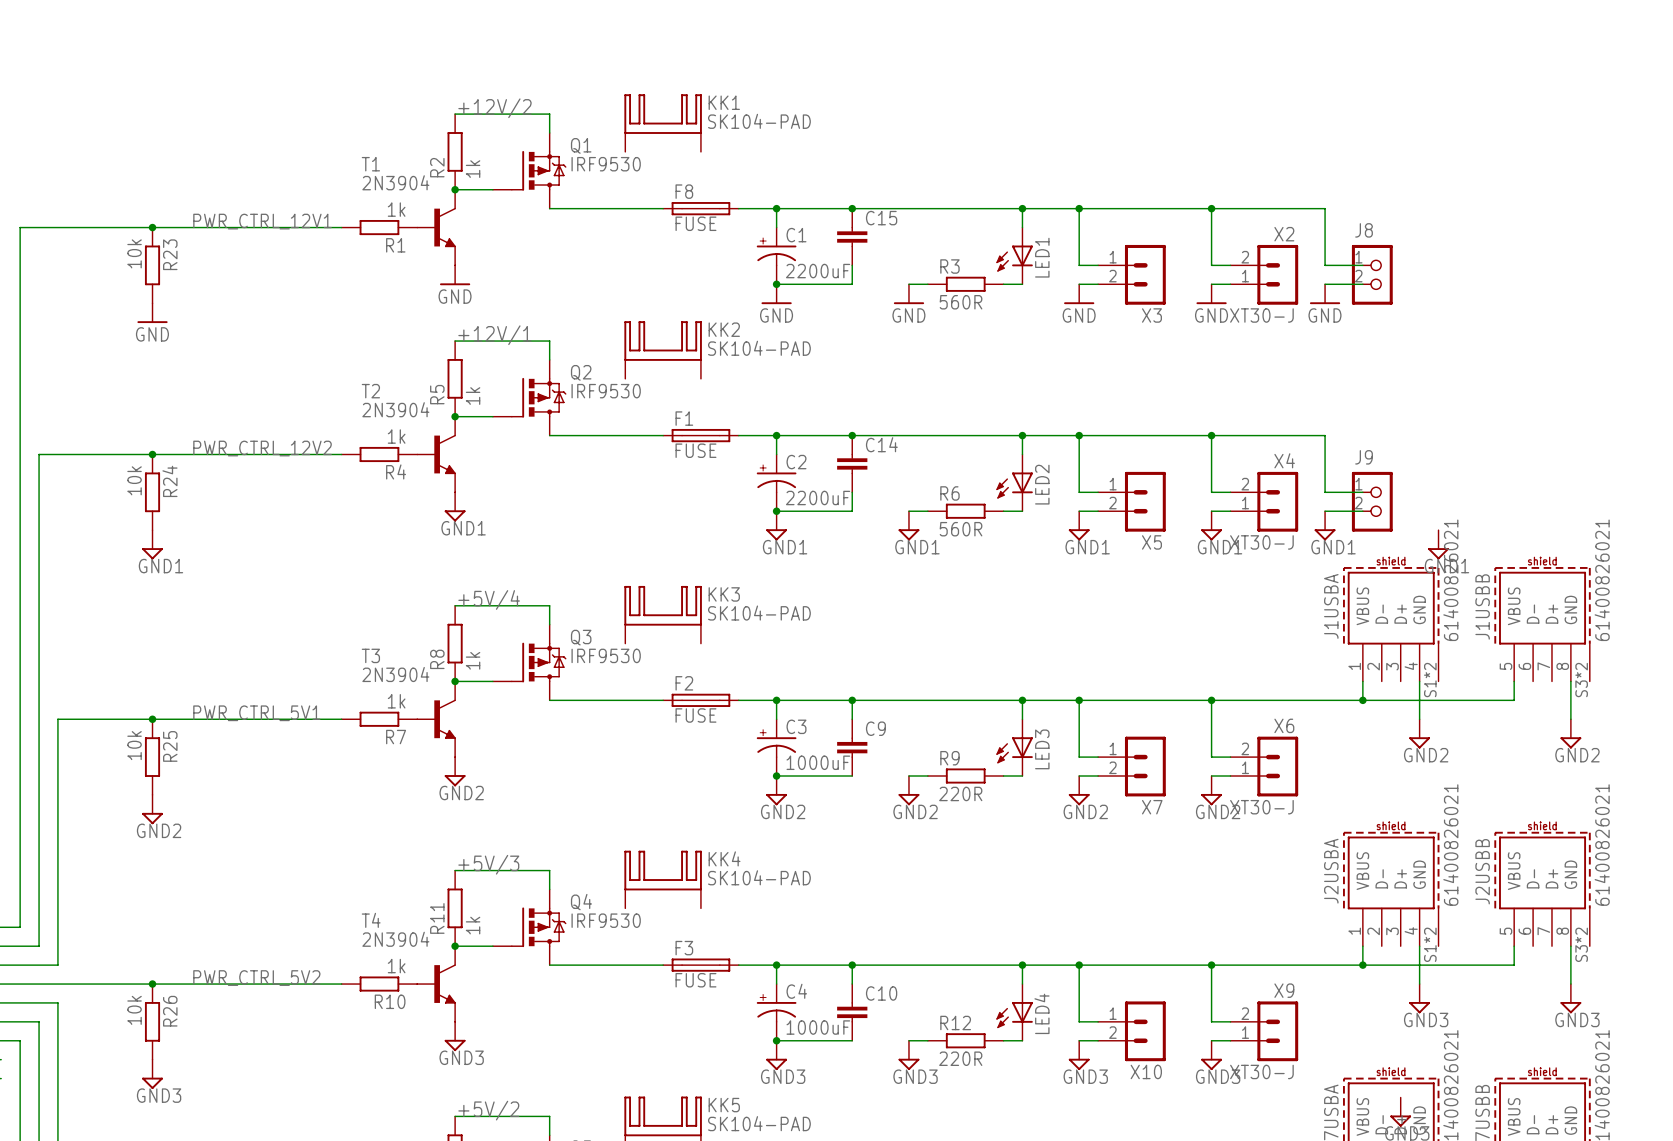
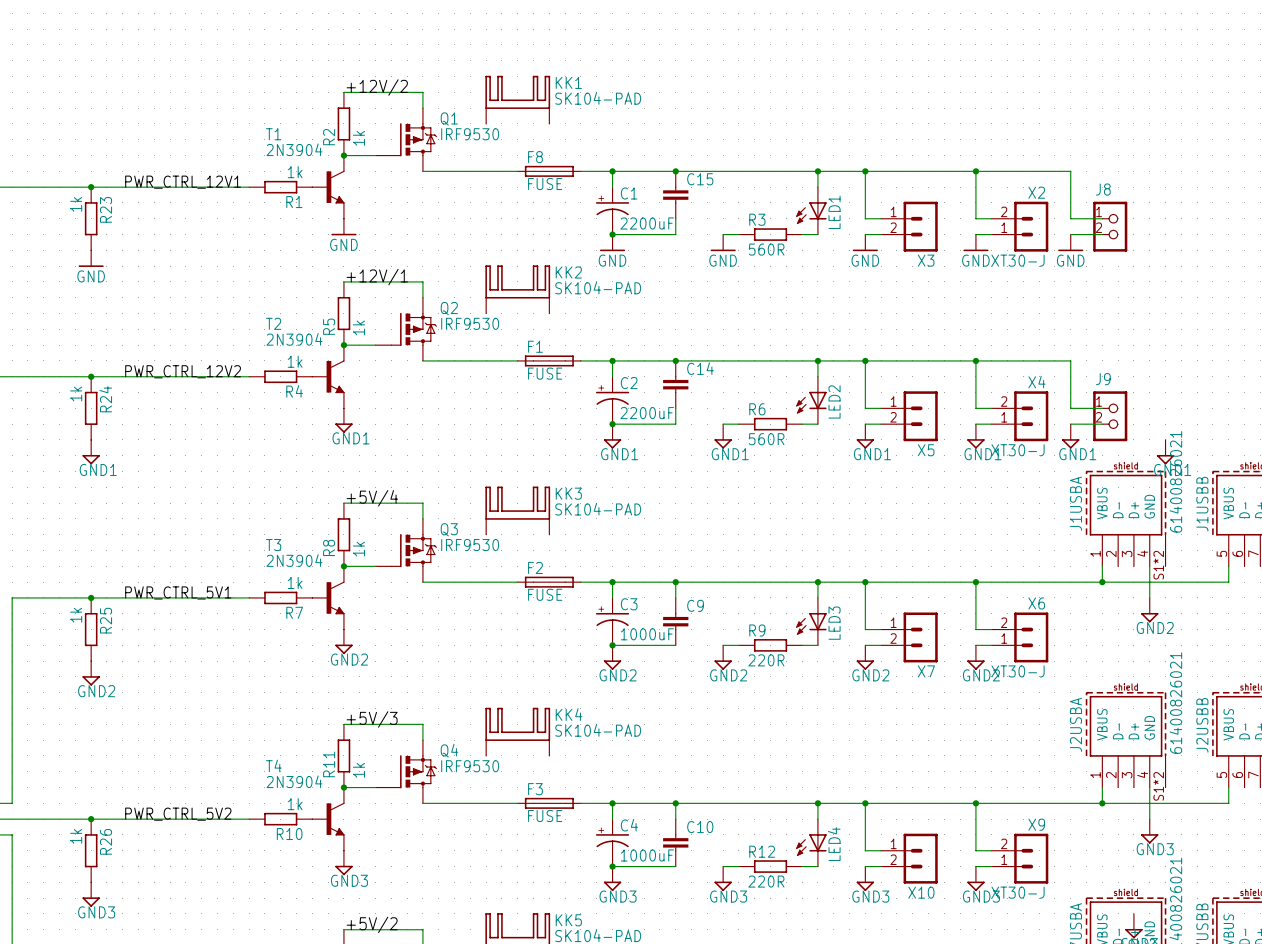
R23 value: 10k (134, 253) -> 1k (76, 204)
R24 value: 10k (134, 480) -> 1k (76, 394)
R25 value: 10k (134, 745) -> 1k (76, 615)
R26 value: 10k (134, 1010) -> 1k (76, 836)

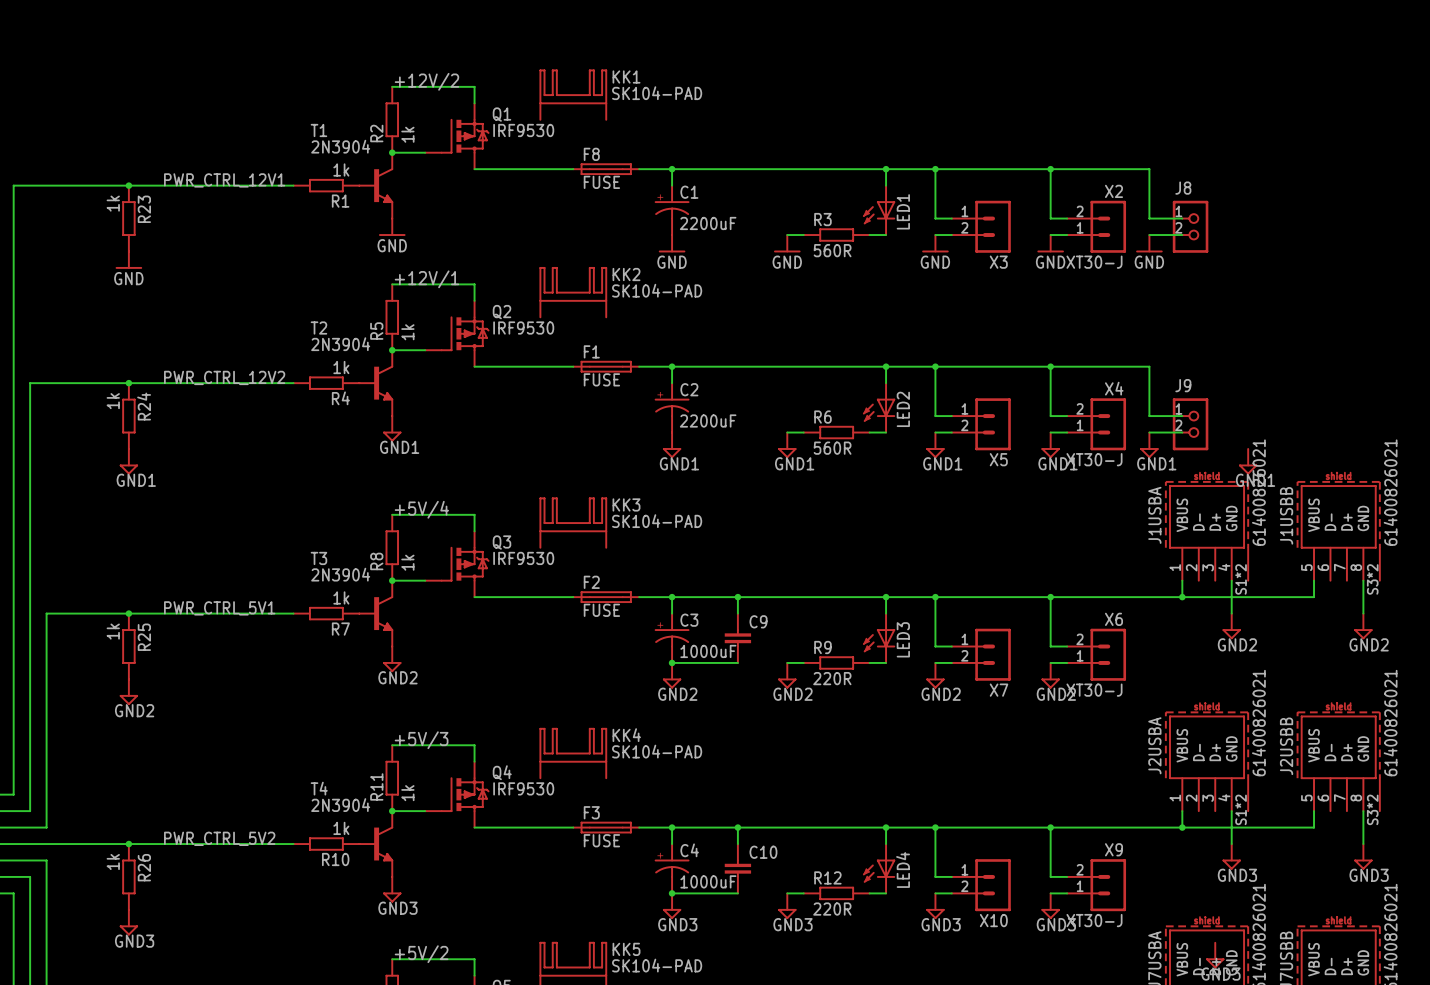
junction: (675, 171) -> none
C15: (675, 195) -> none
wire: (675, 218) (675, 234) (612, 234) -> none
junction: (612, 234) -> none
junction: (675, 360) -> none
C14: (675, 384) -> none
wire: (675, 408) (675, 424) (612, 424) -> none
junction: (612, 424) -> none

